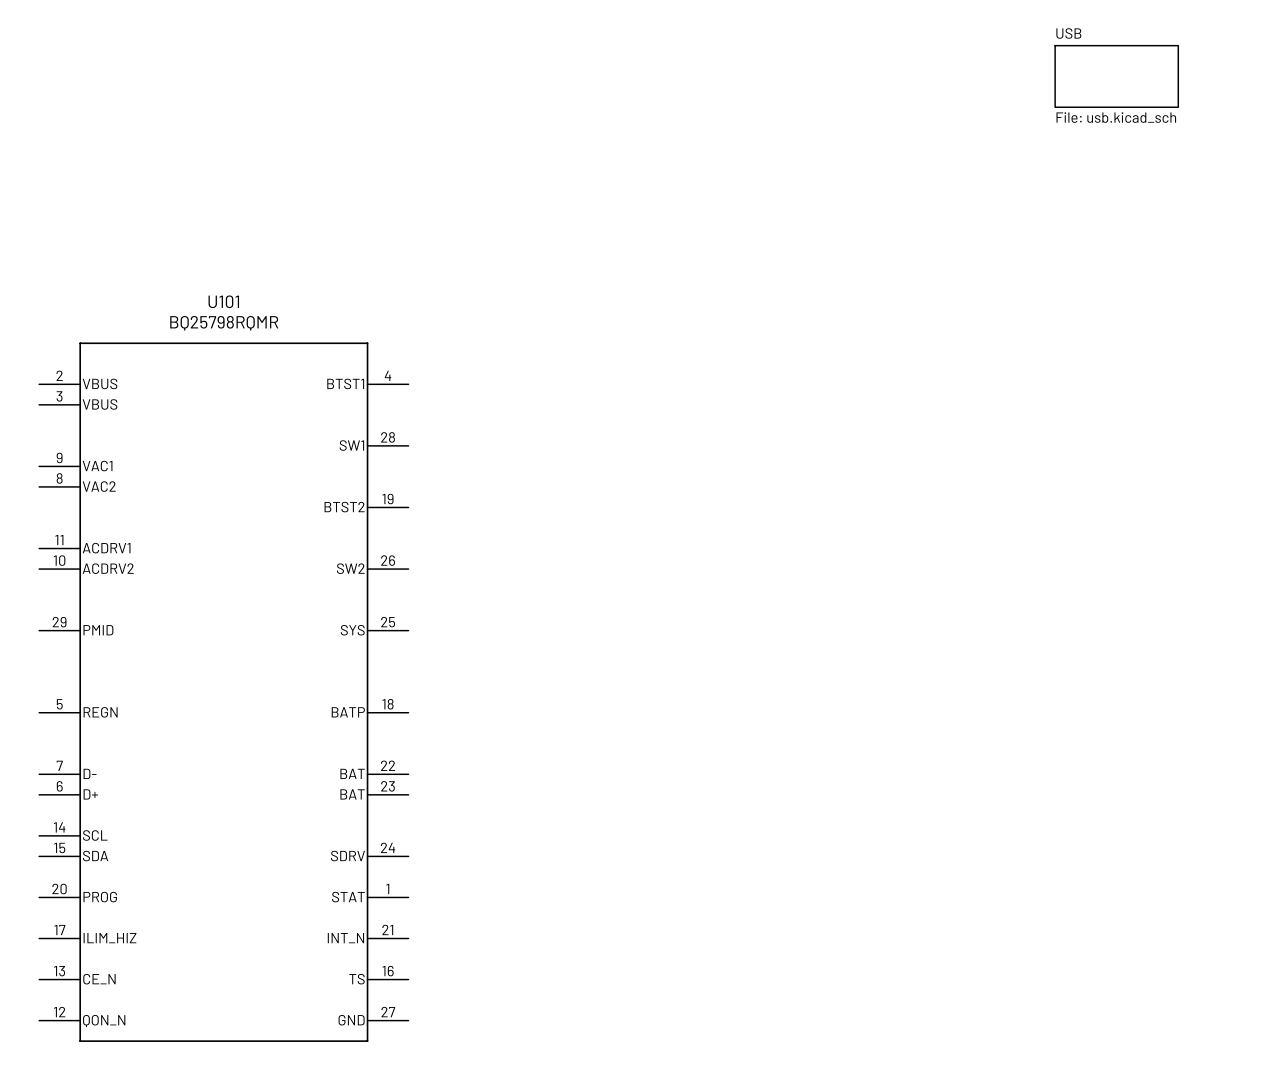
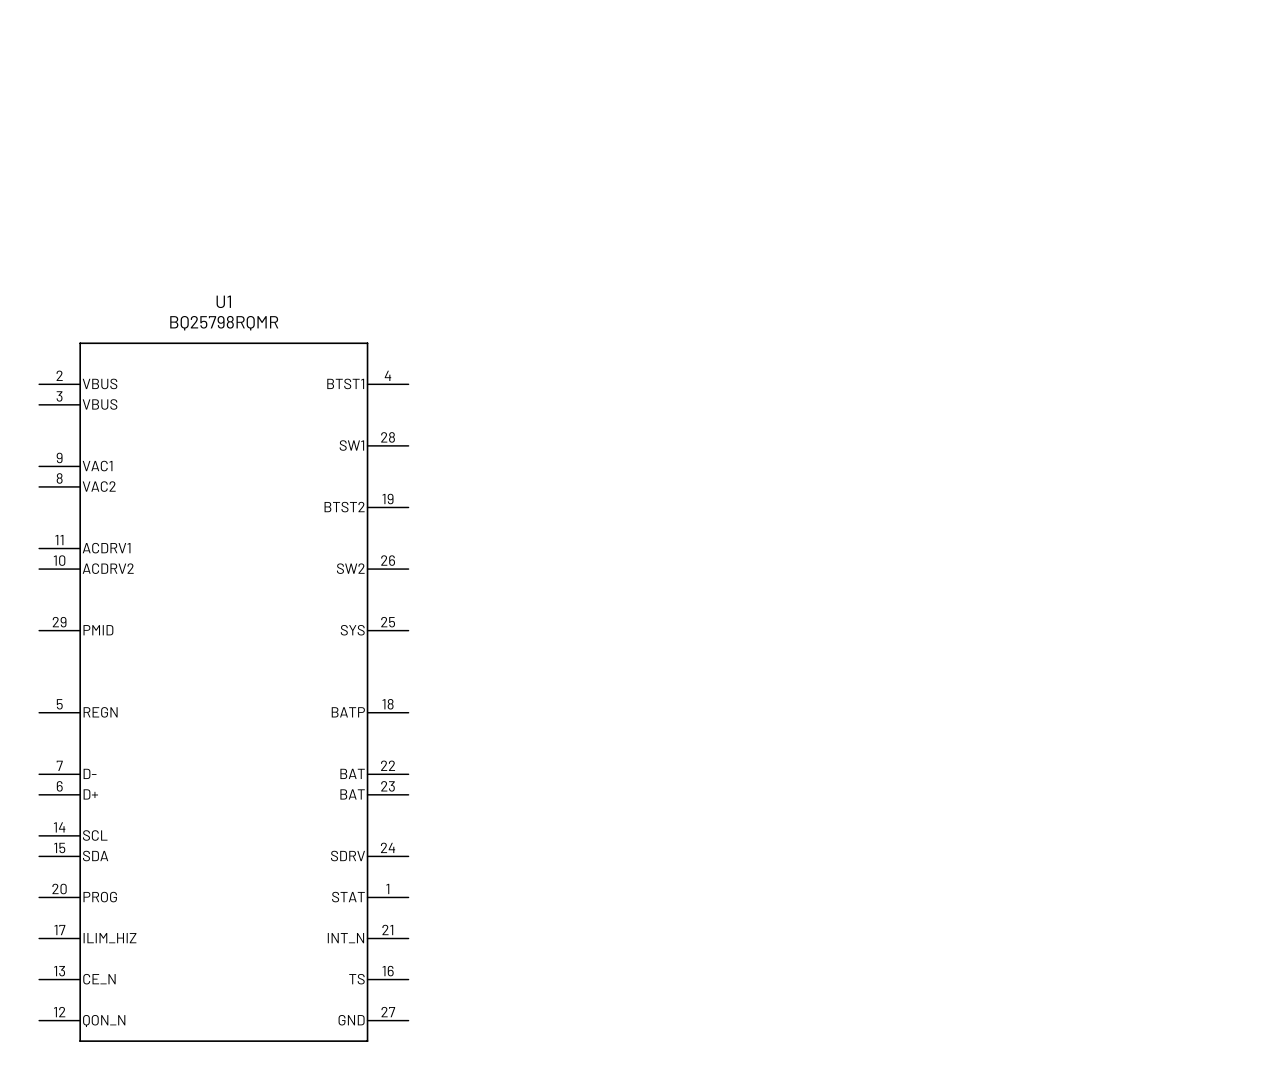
sheet USB: File: usb.kicad_sch (1116, 76) -> none
U101 name: U101 (223, 301) -> U1 (223, 301)

